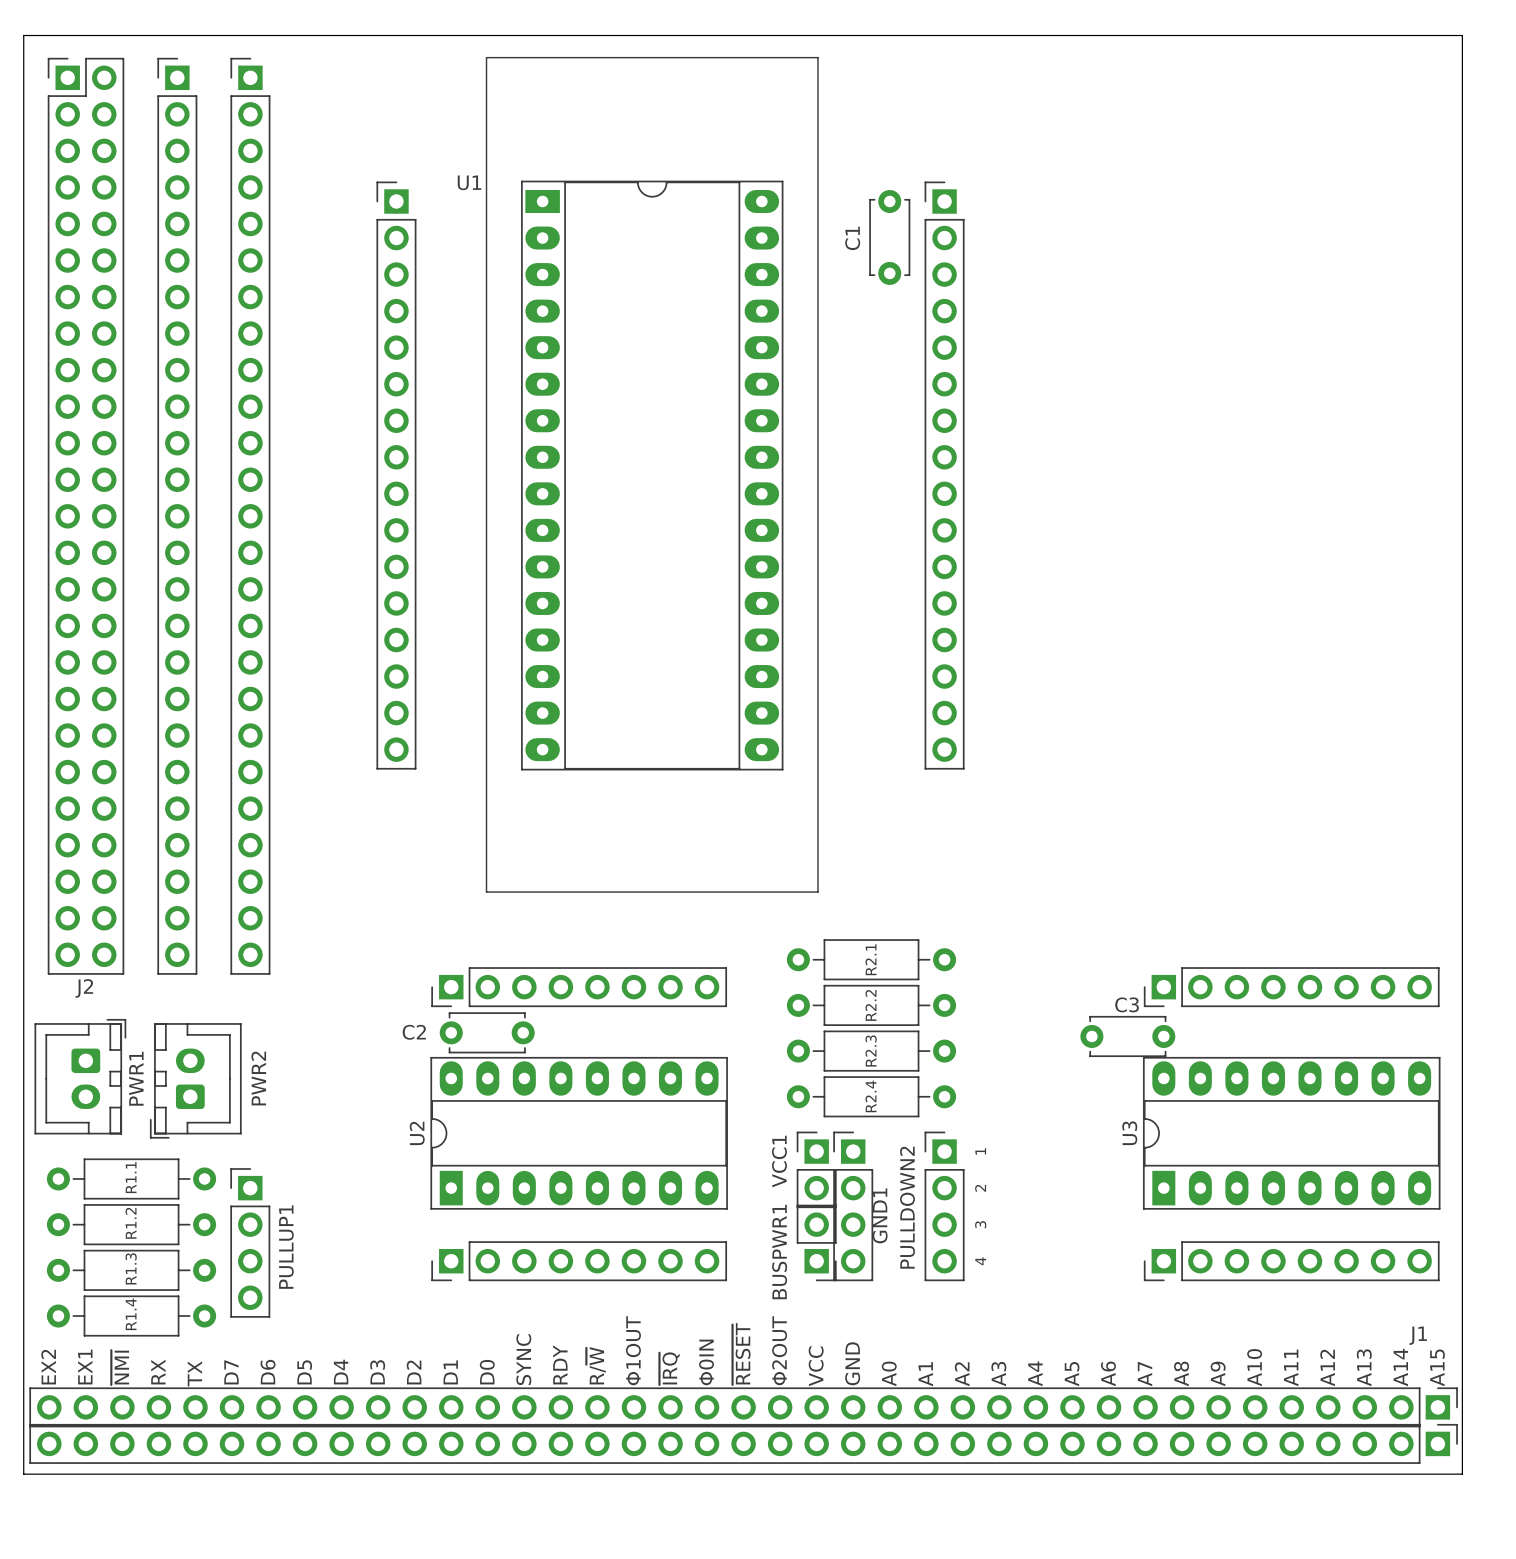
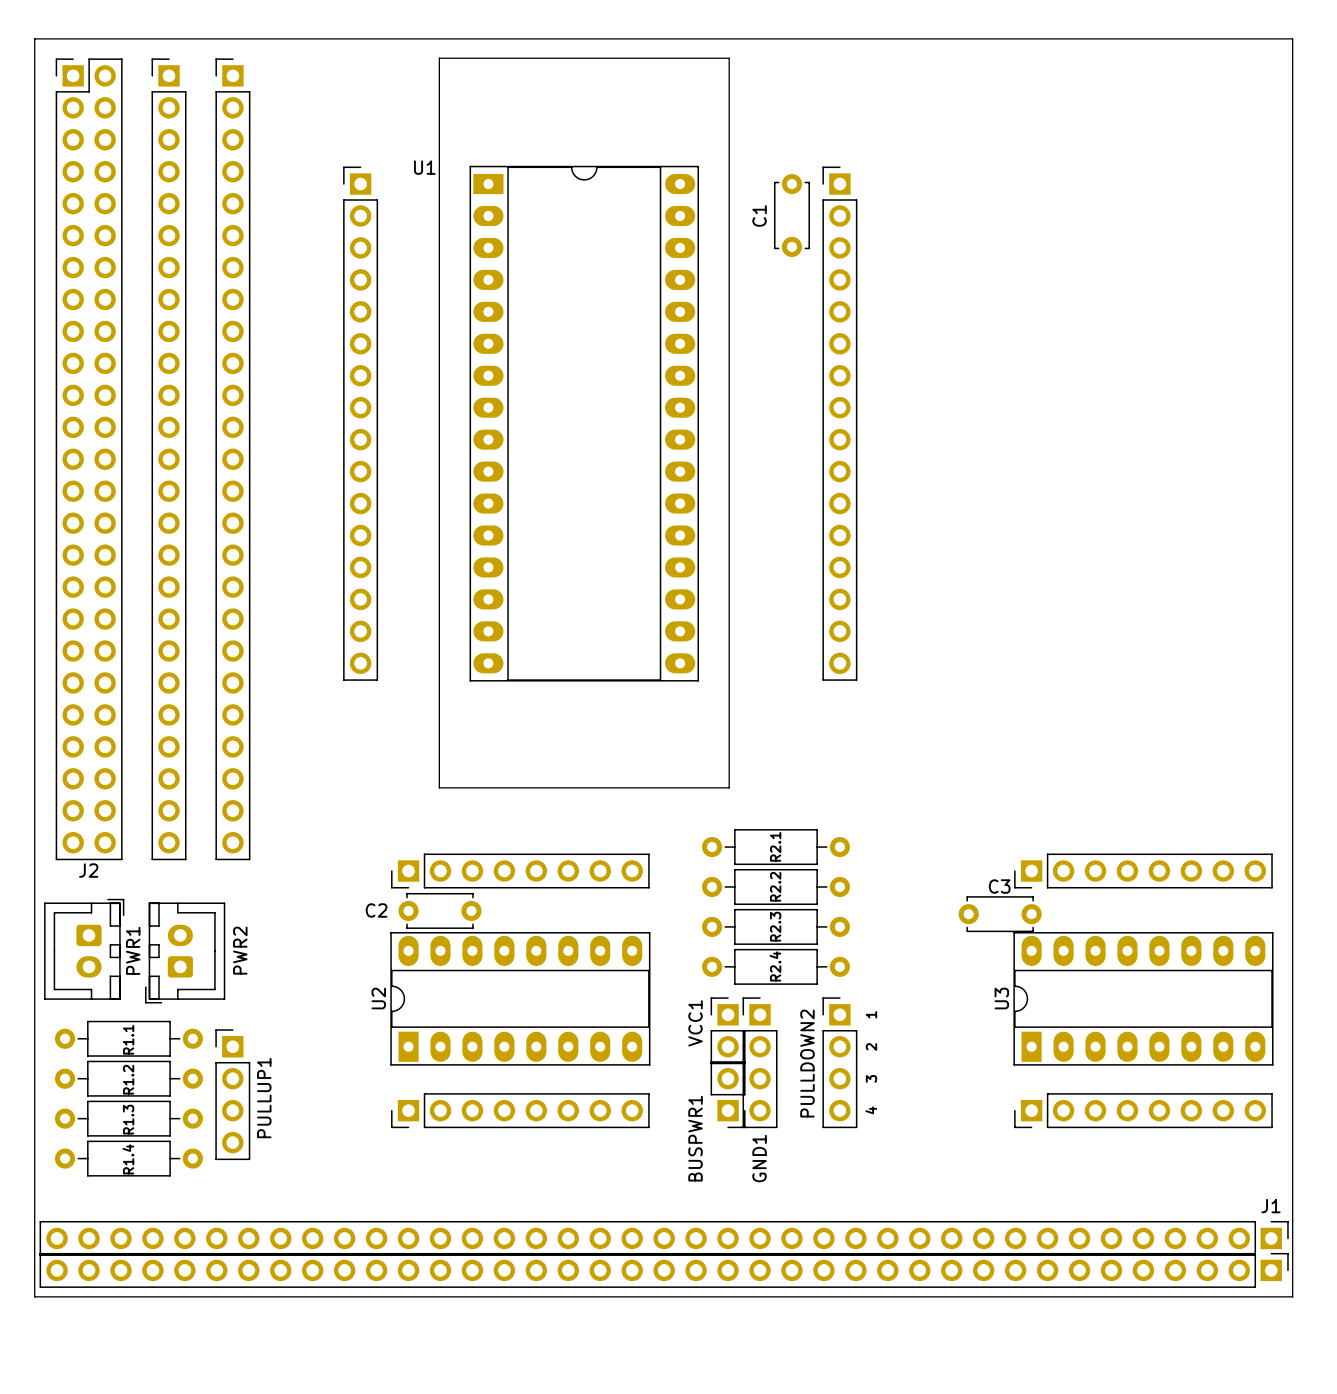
GND1 name position: GND1 (880, 1215) -> GND1 (759, 1158)
BUSPWR1 name position: BUSPWR1 (779, 1252) -> BUSPWR1 (695, 1138)
J1 name position: J1 (1418, 1335) -> J1 (1270, 1206)
part footprint: [29, 1387, 1458, 1428] -> [39, 1220, 1289, 1256]

